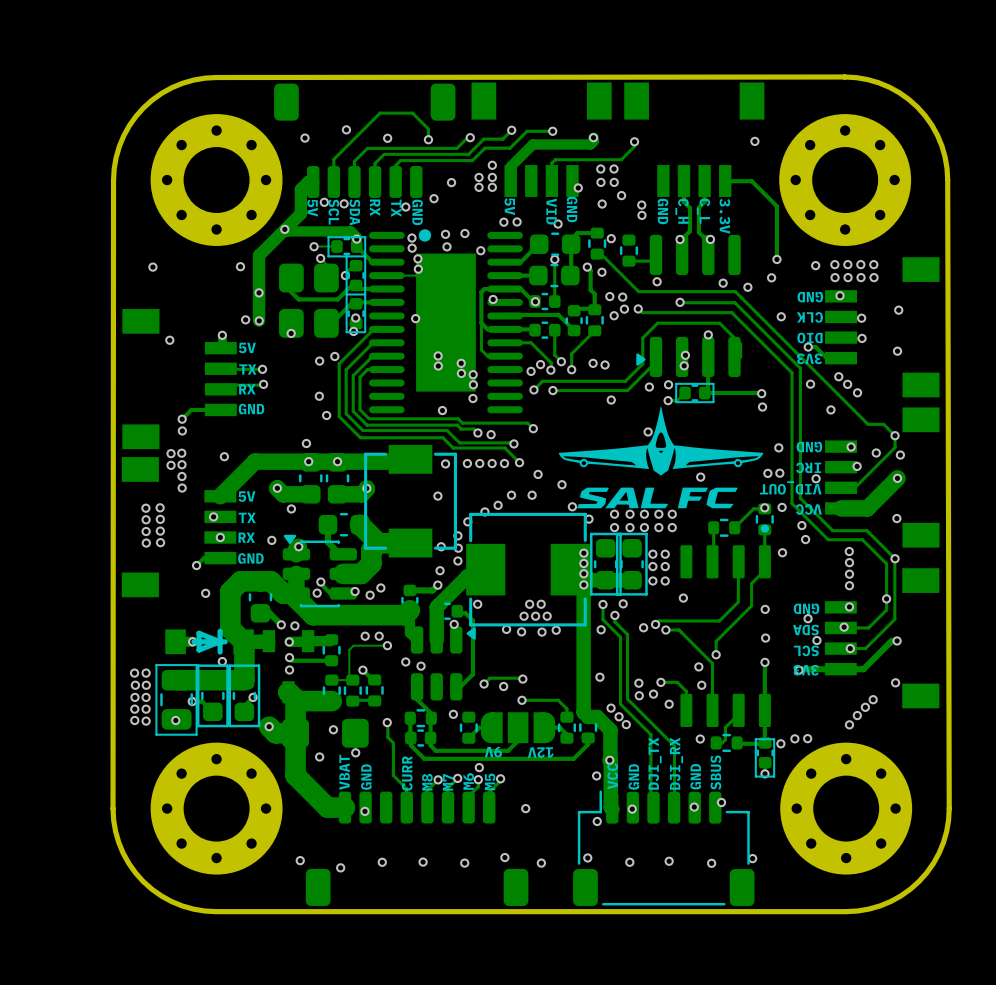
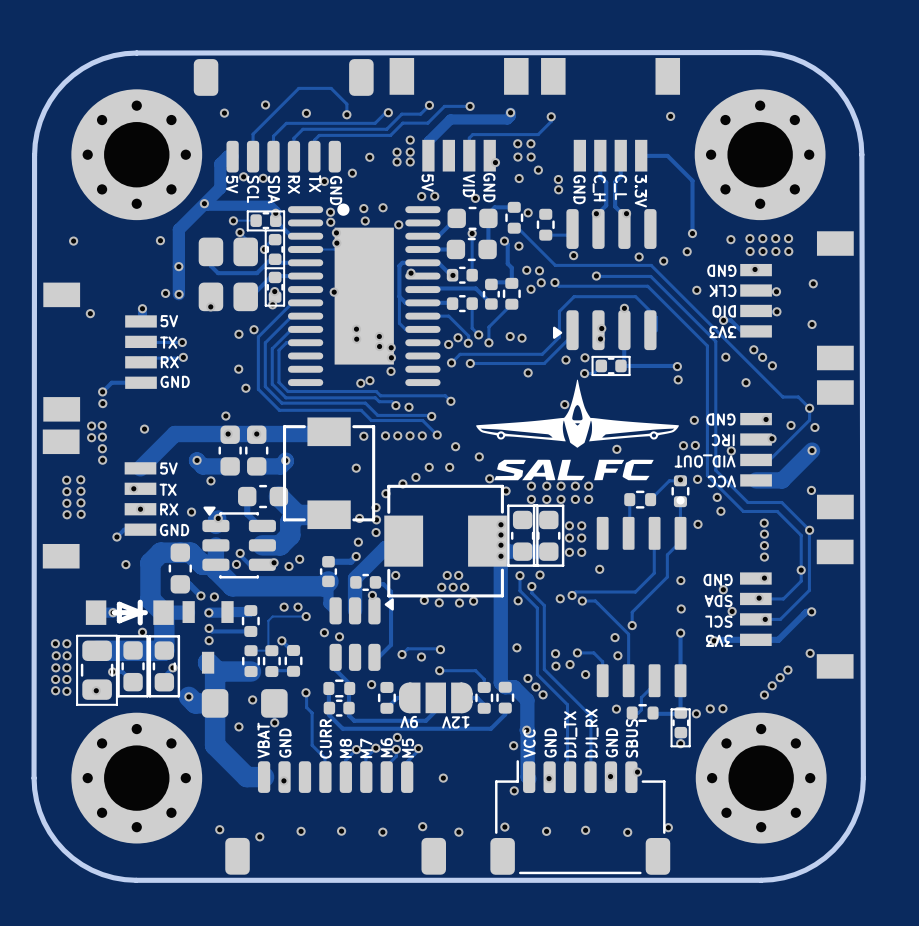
via: none -> (369, 380)

